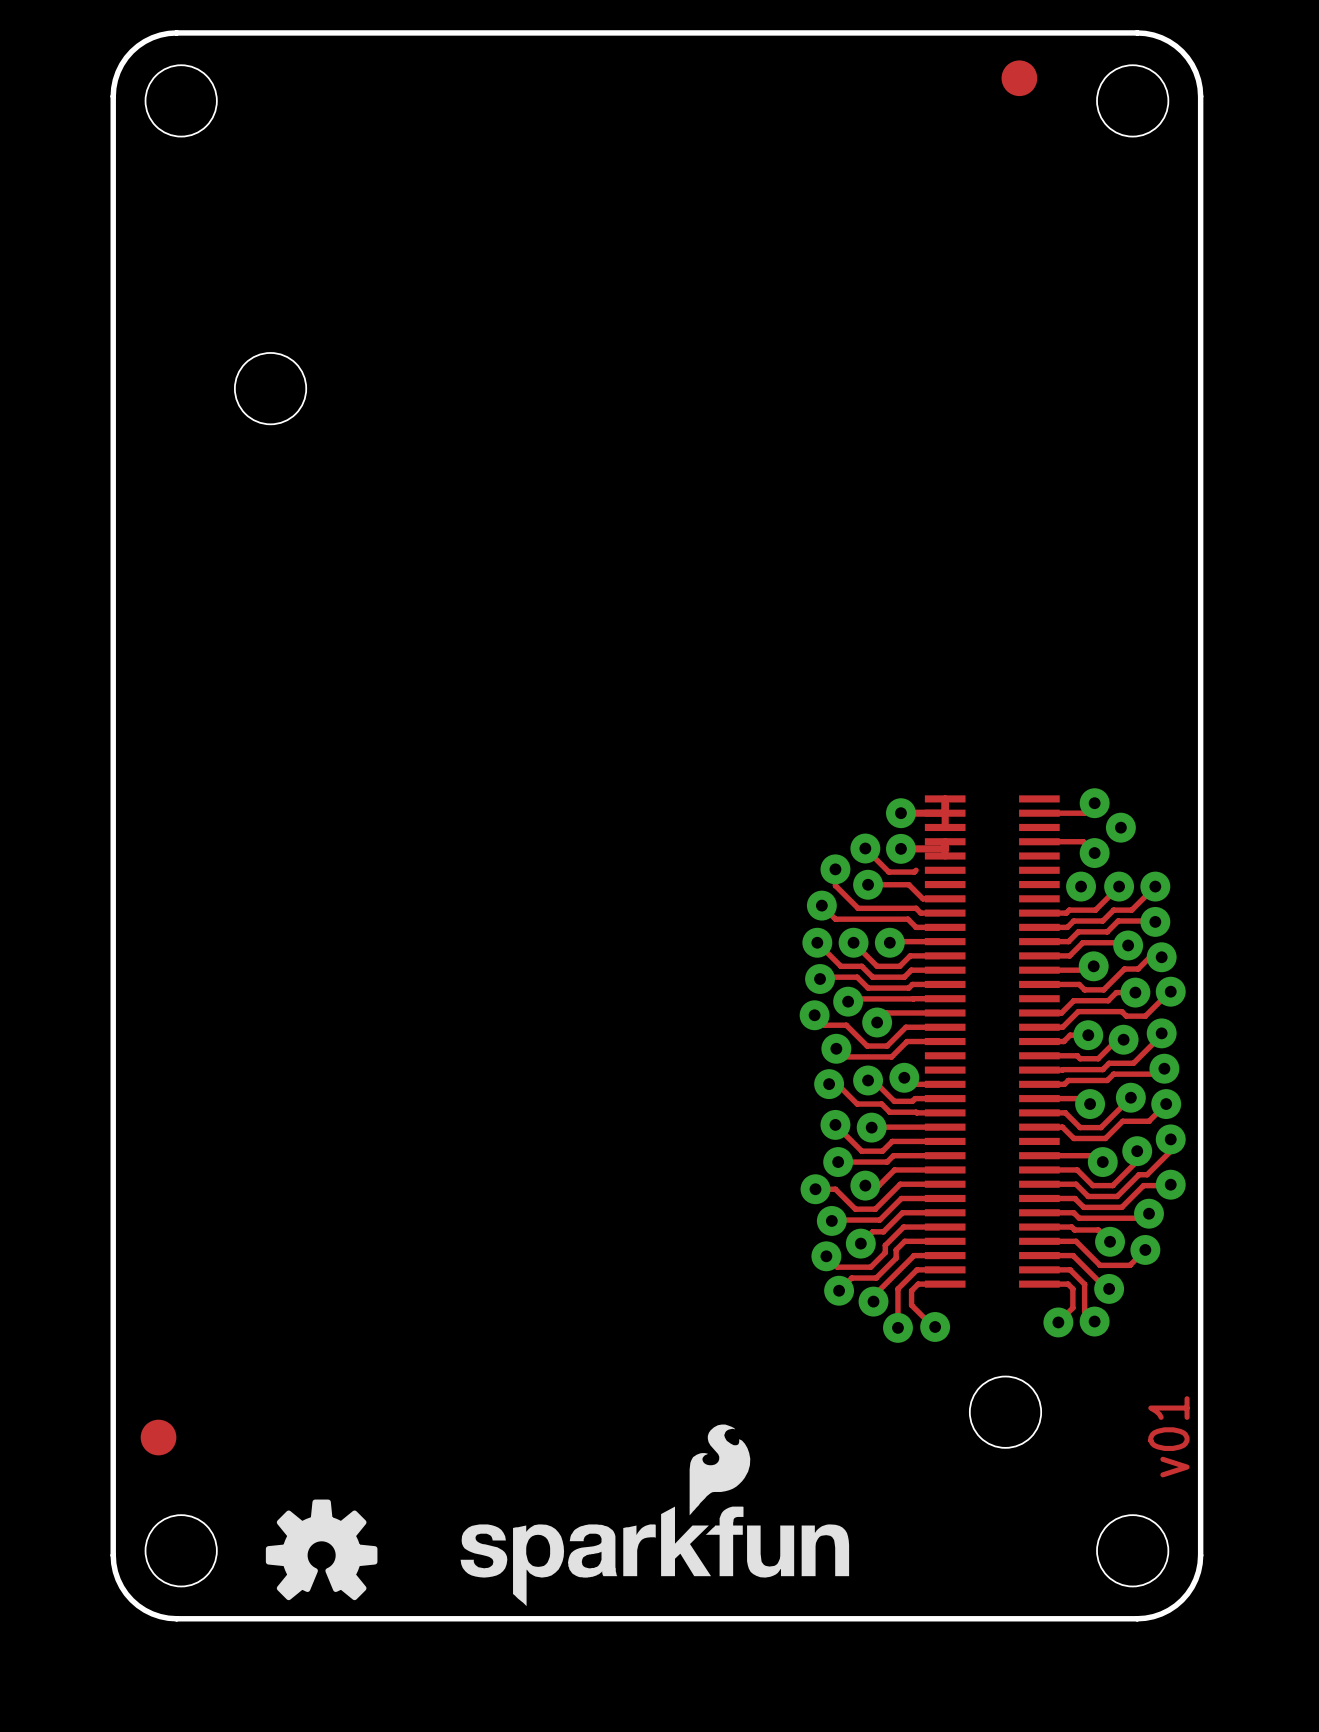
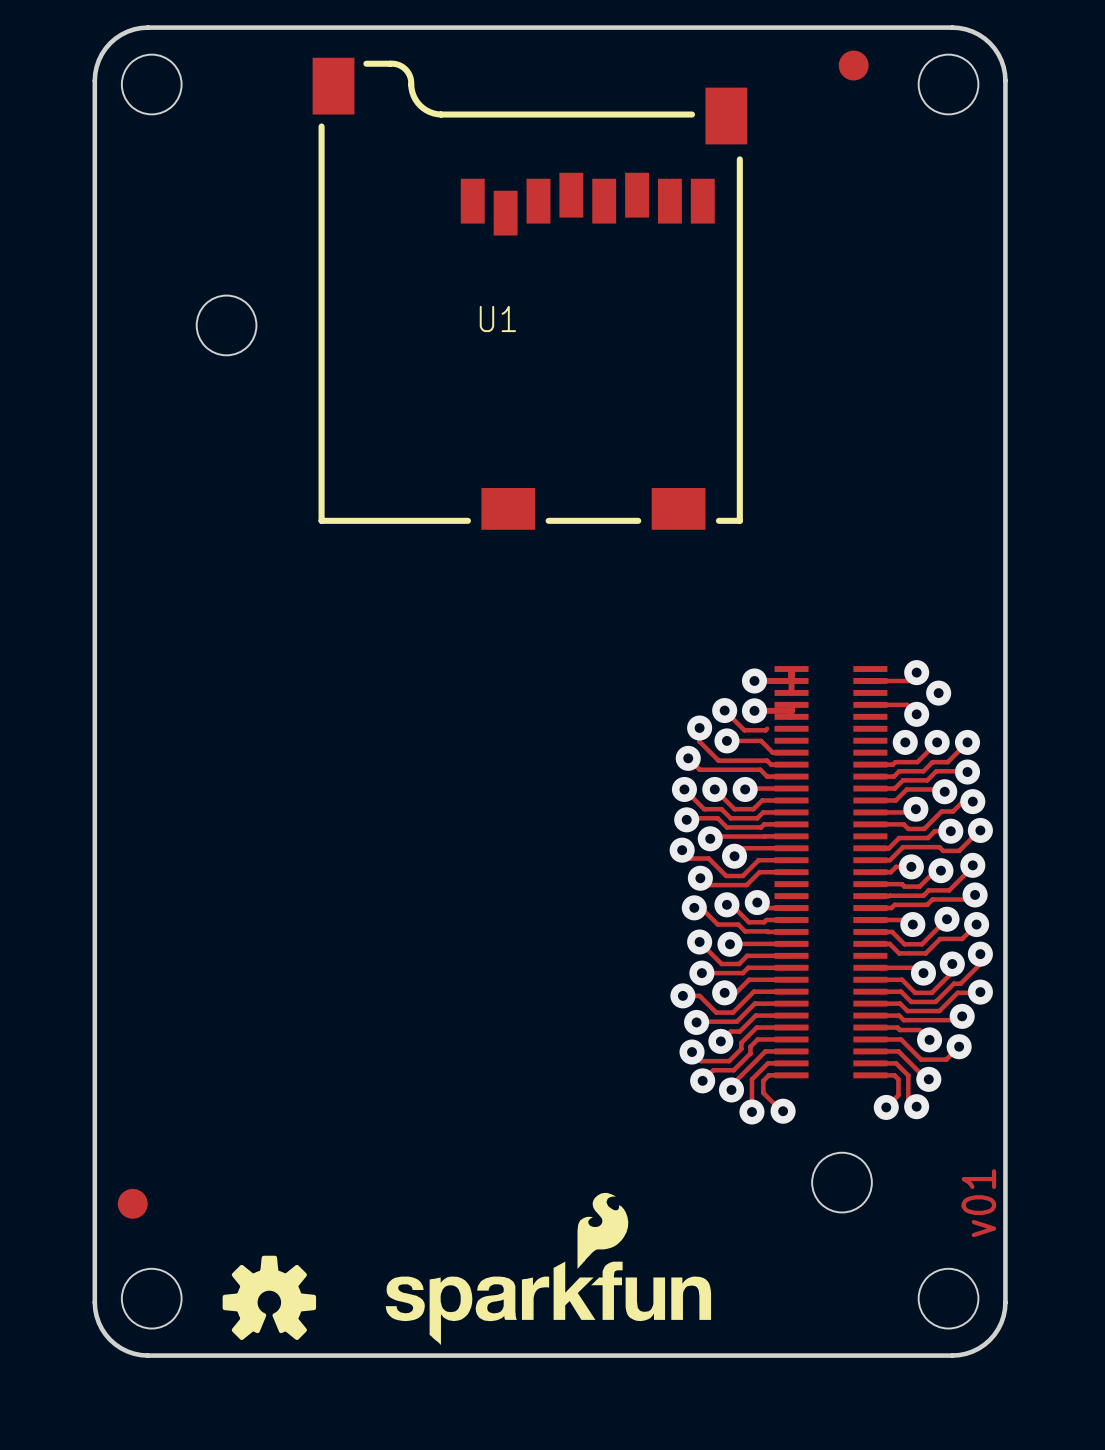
U1: none -> (529, 293)

